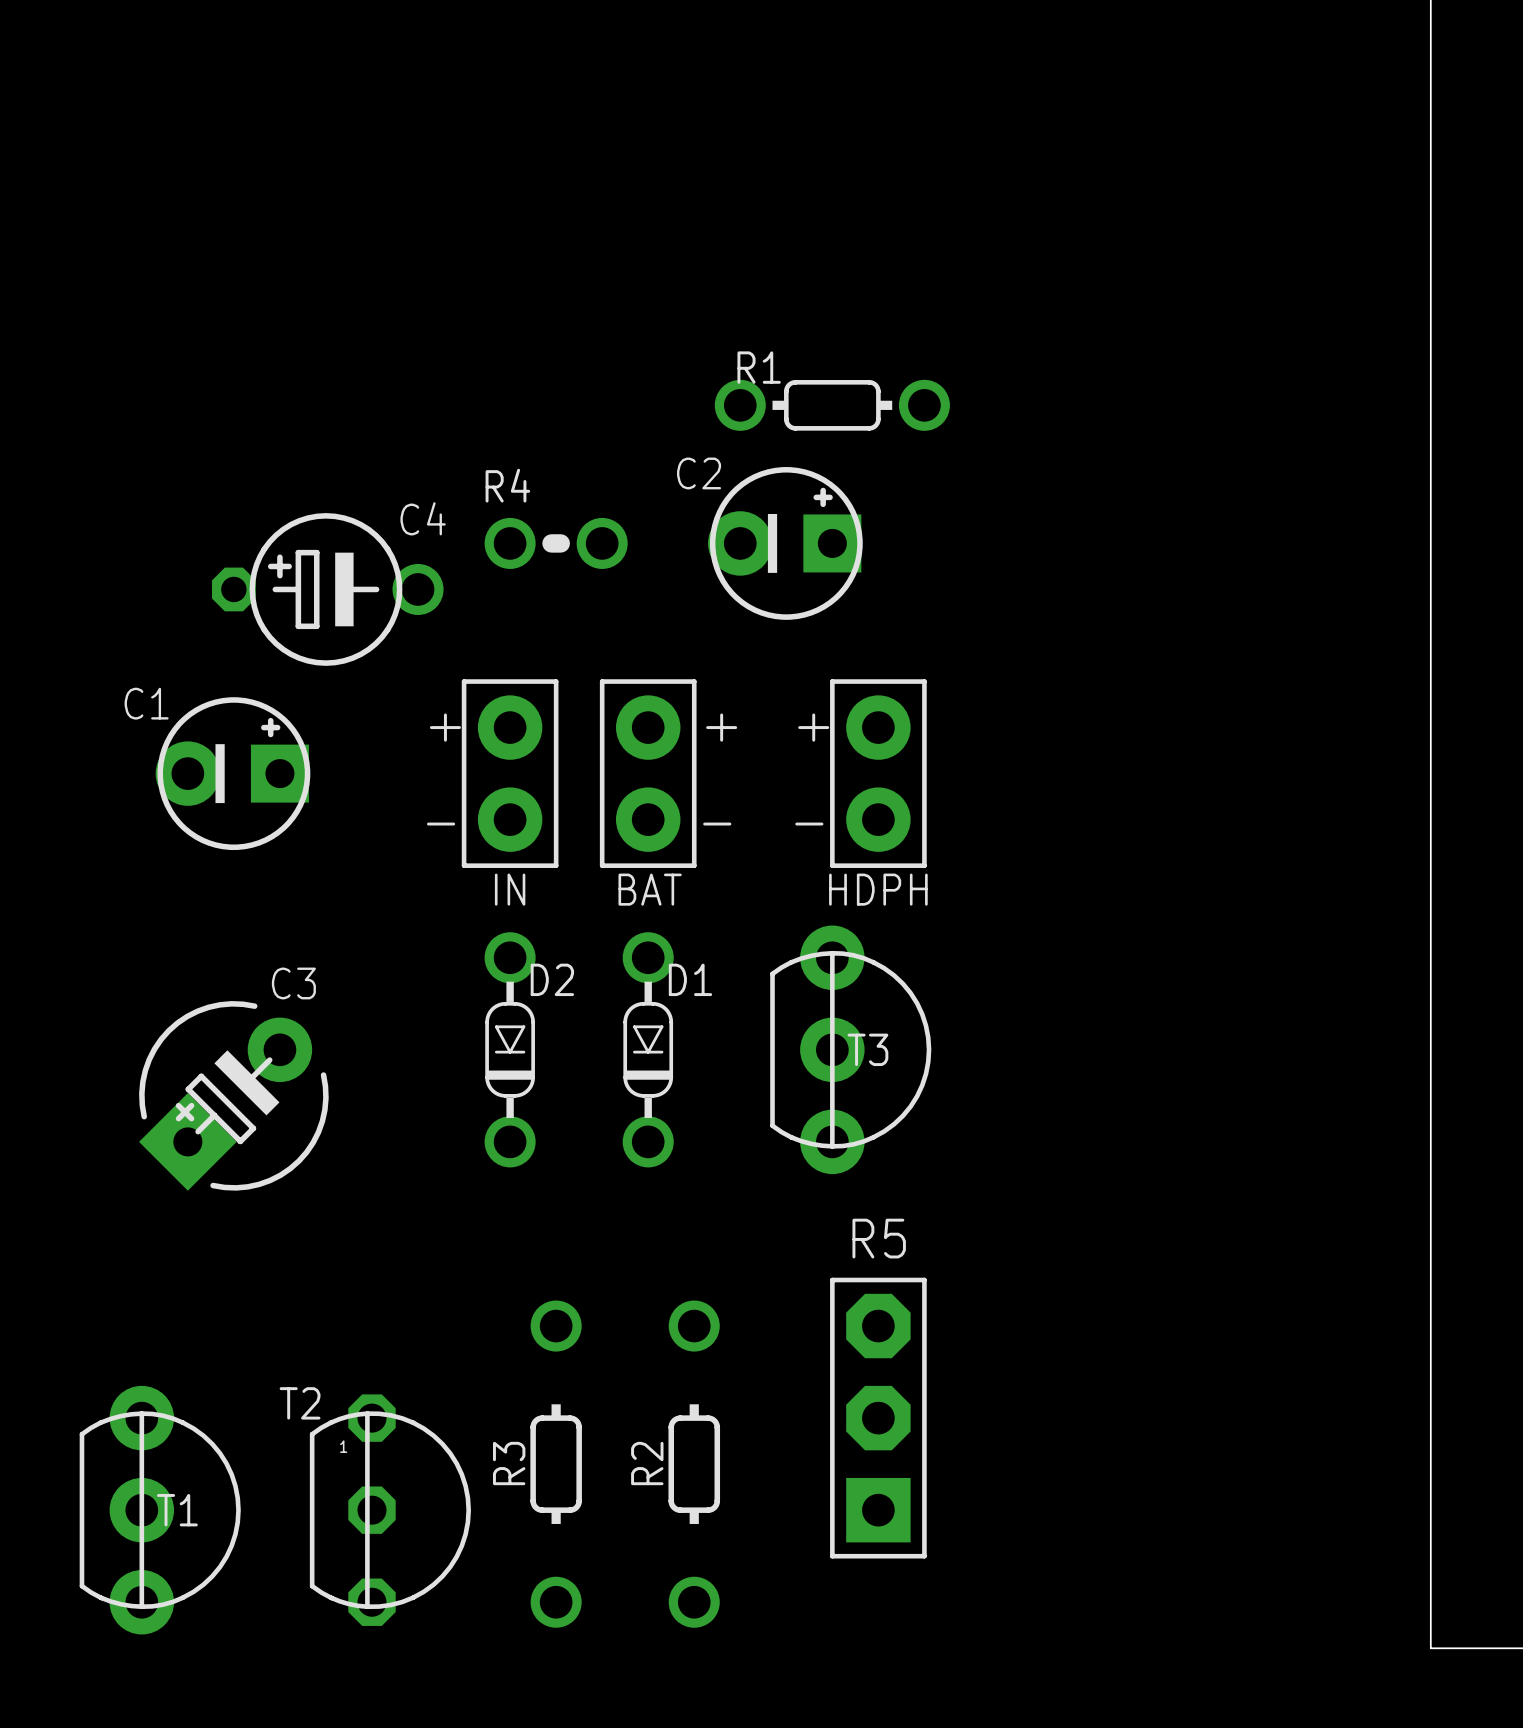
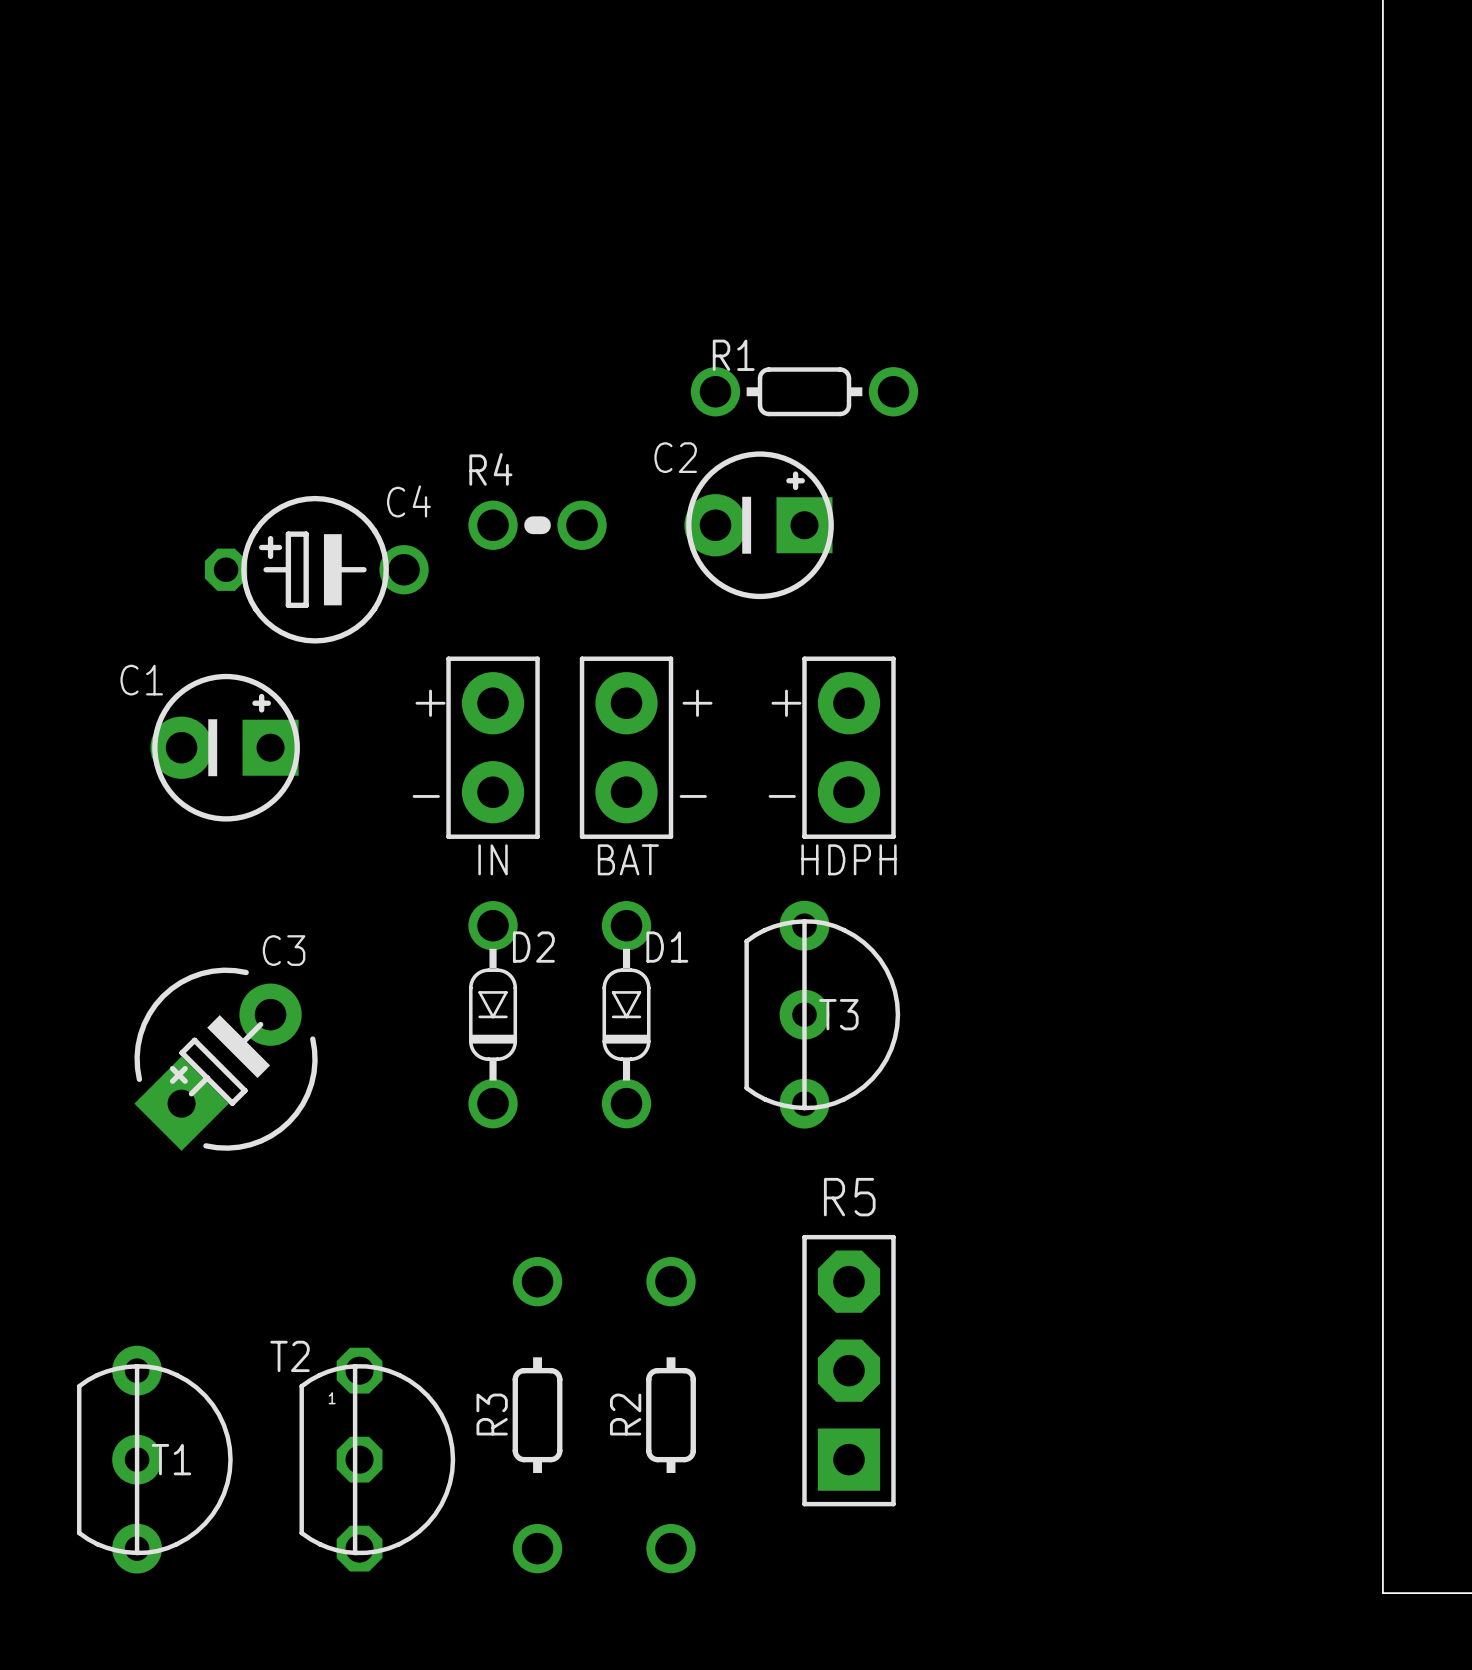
T3 footprint: [770, 925, 932, 1175] -> [744, 900, 901, 1129]
T1 footprint: [79, 1385, 241, 1635] -> [77, 1345, 233, 1574]

